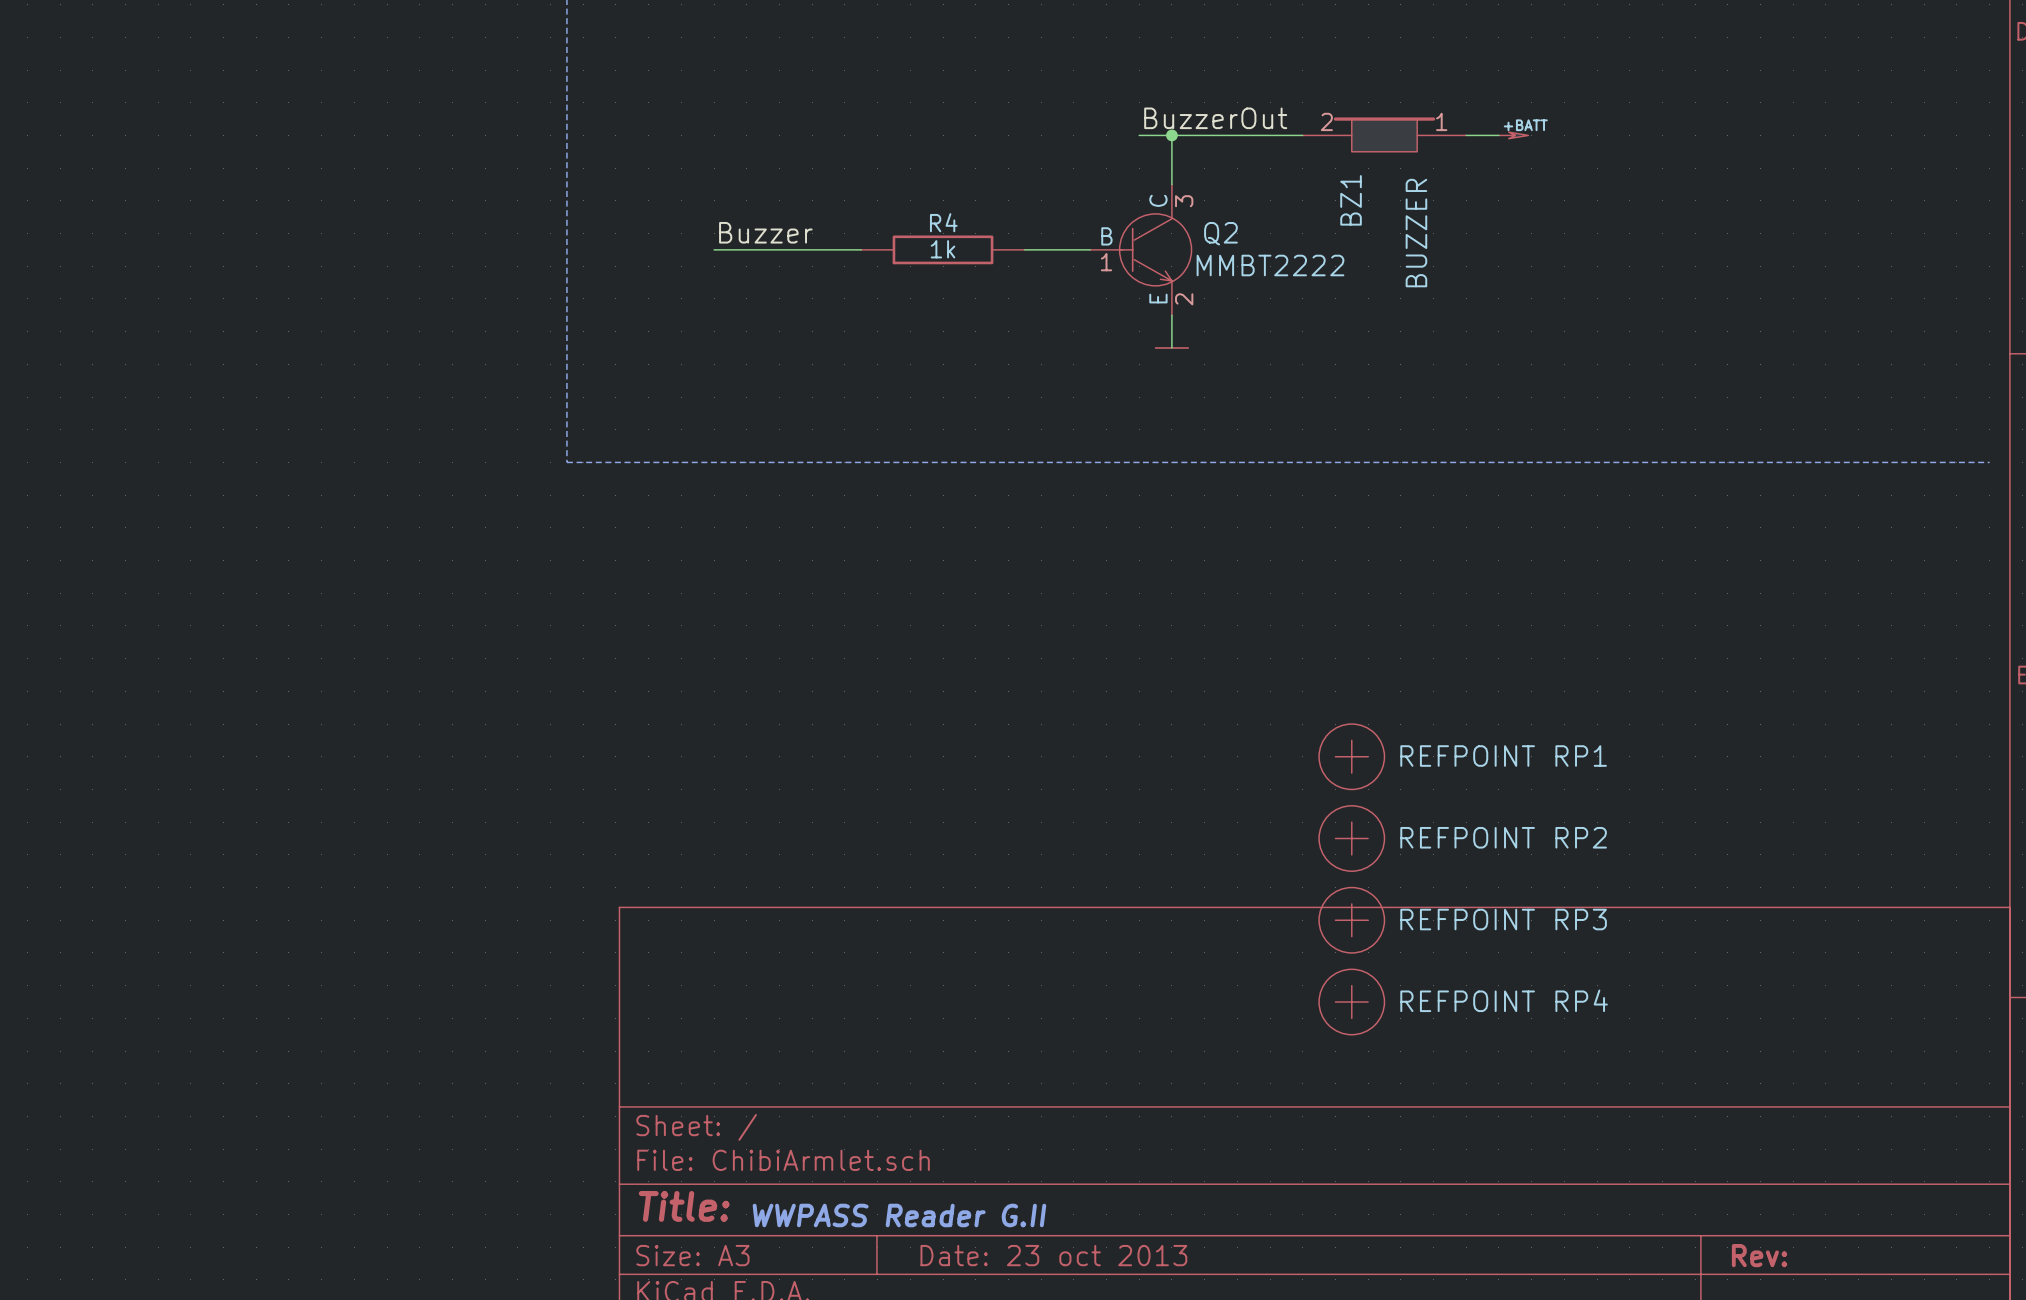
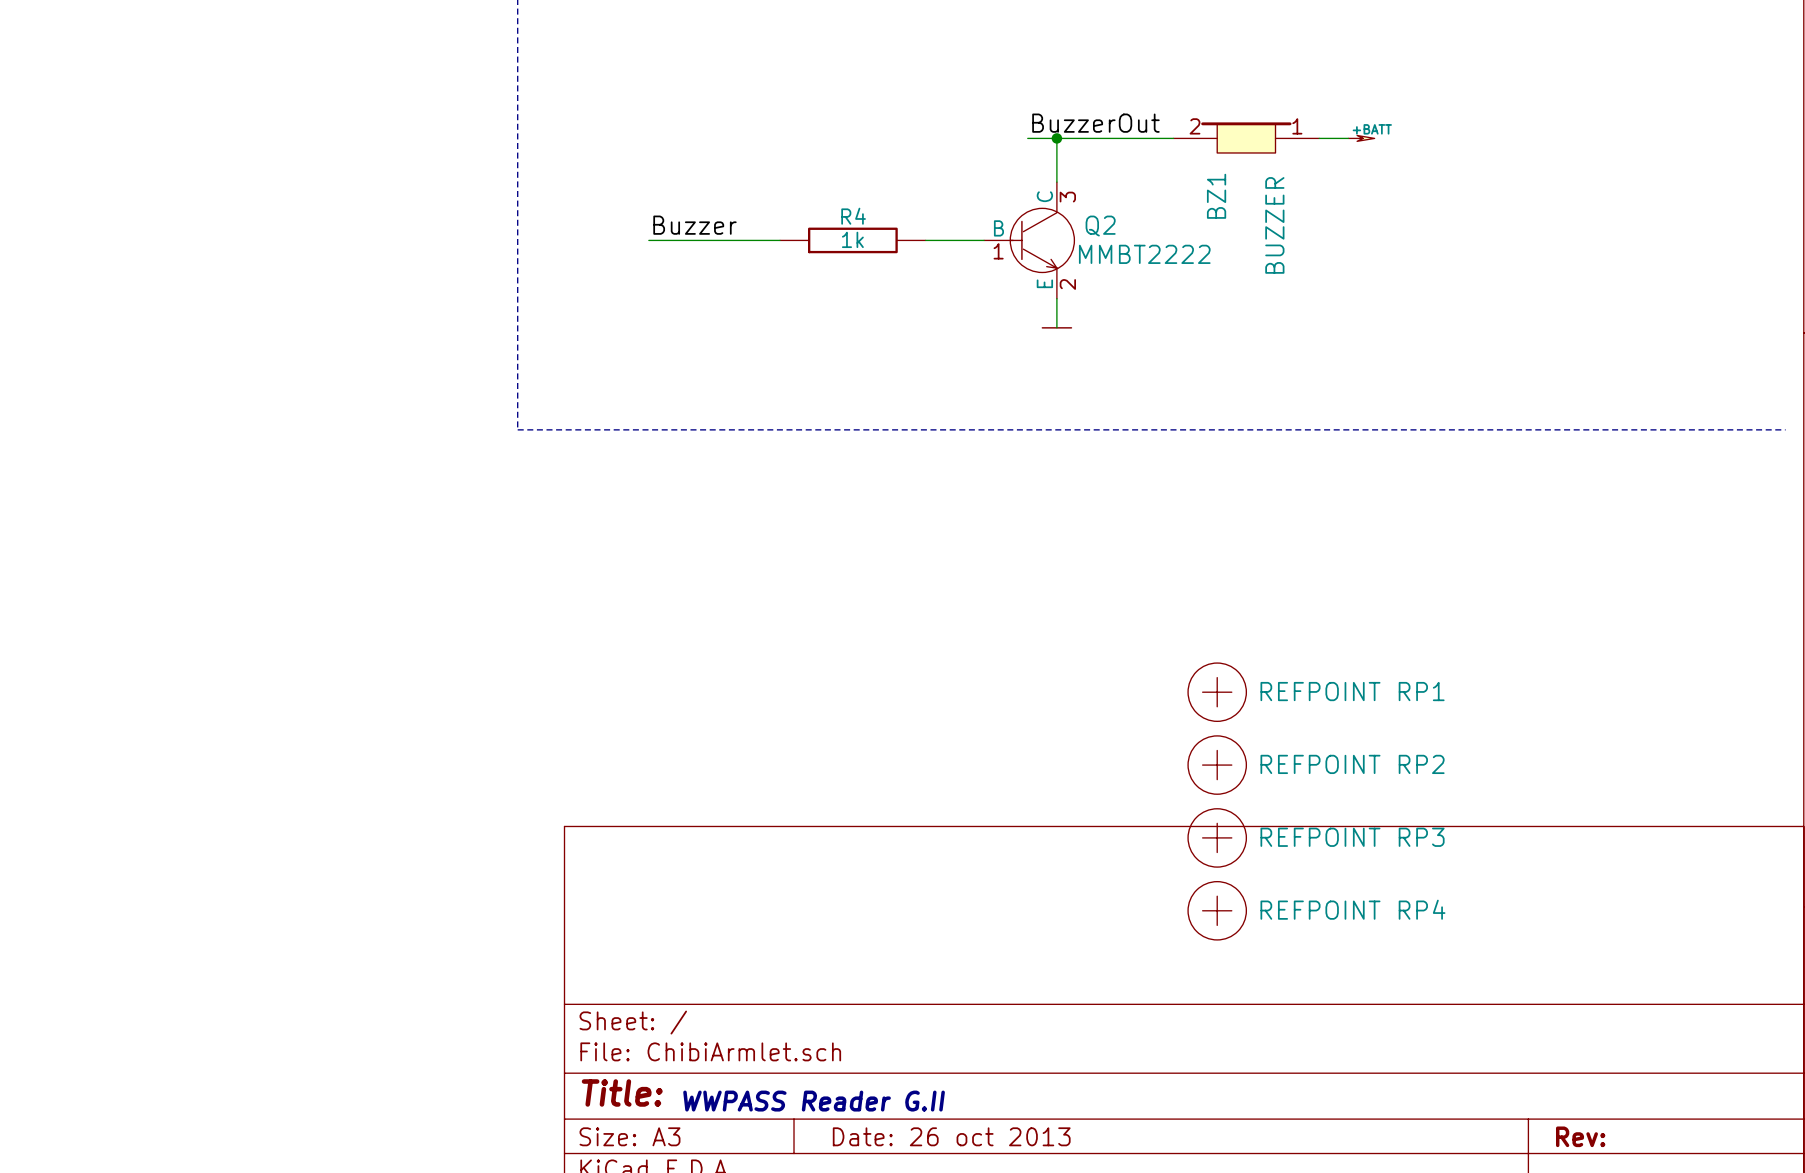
title block: Date: 23 oct 2013 (1053, 1255) -> Date: 26 oct 2013 (951, 1136)

